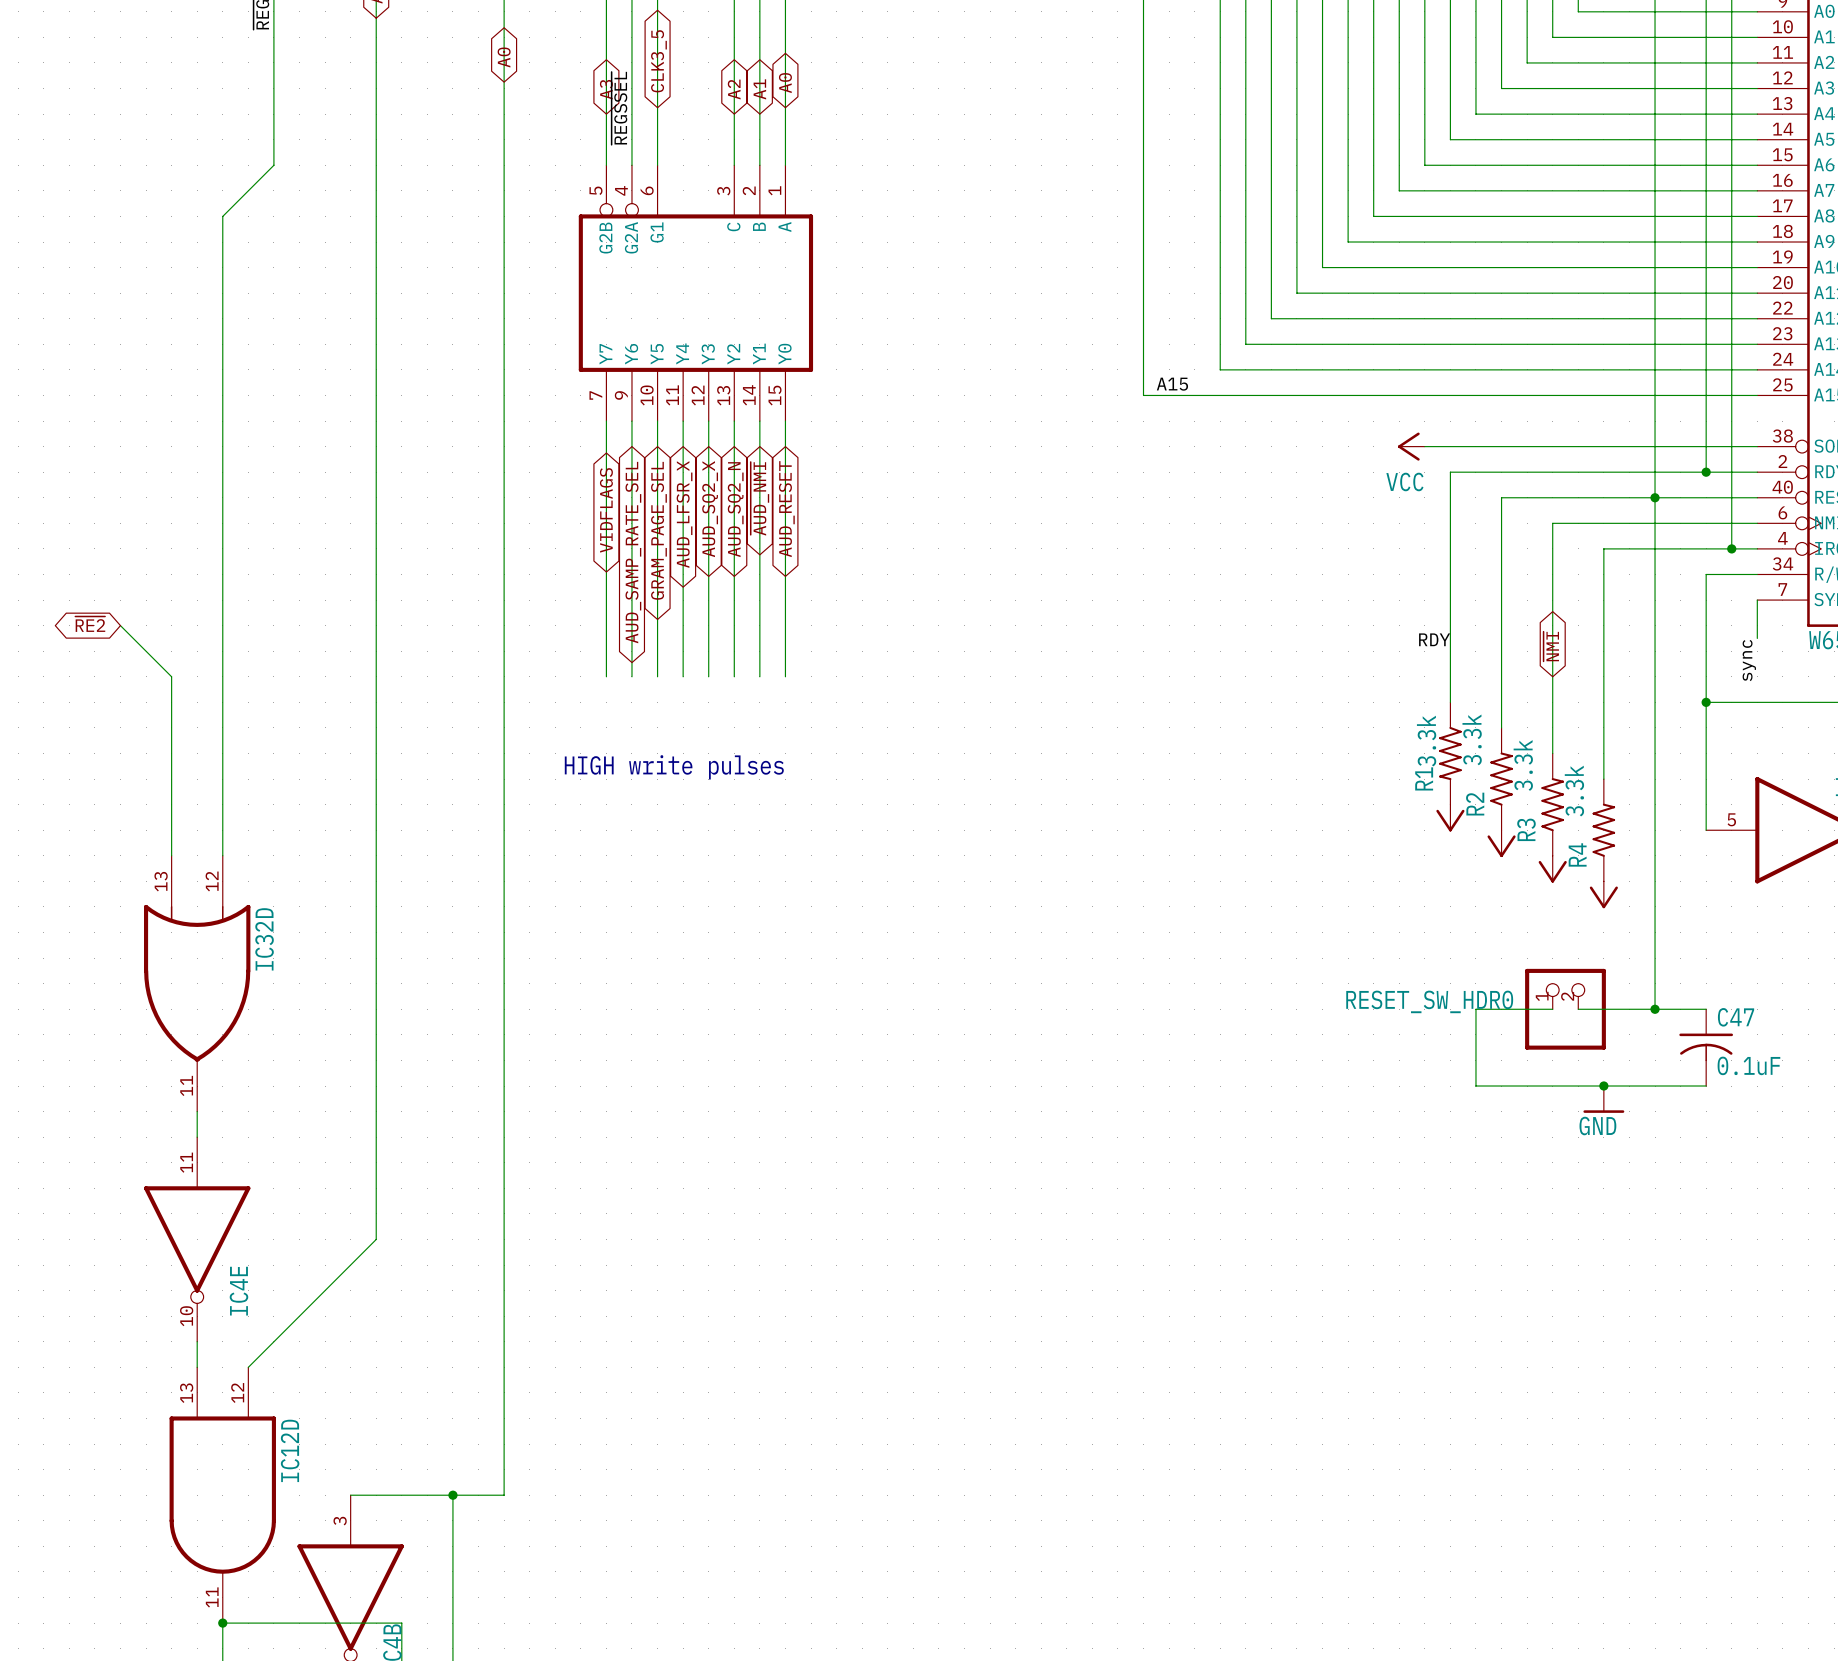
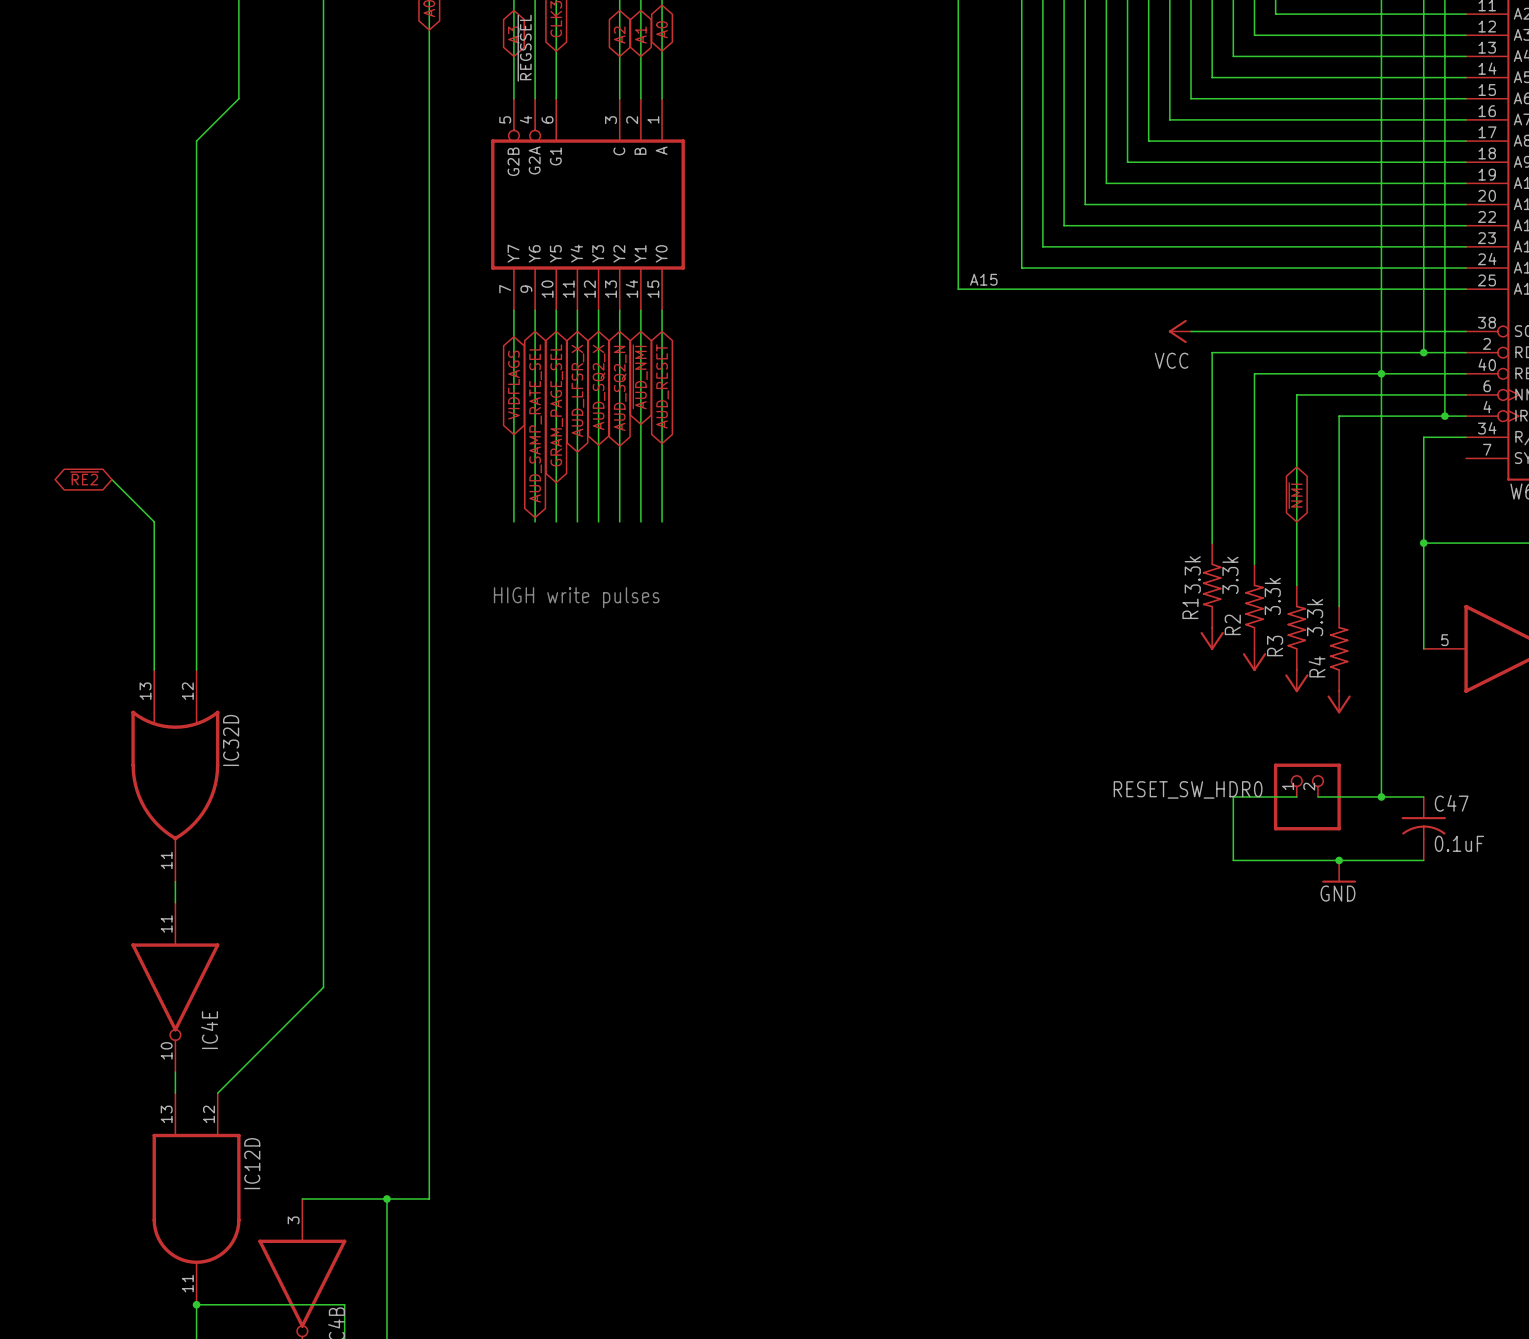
wire: (1757, 600) (1757, 638) -> none
label: RDY (1434, 639) -> none
label: sync (1749, 660) -> none

